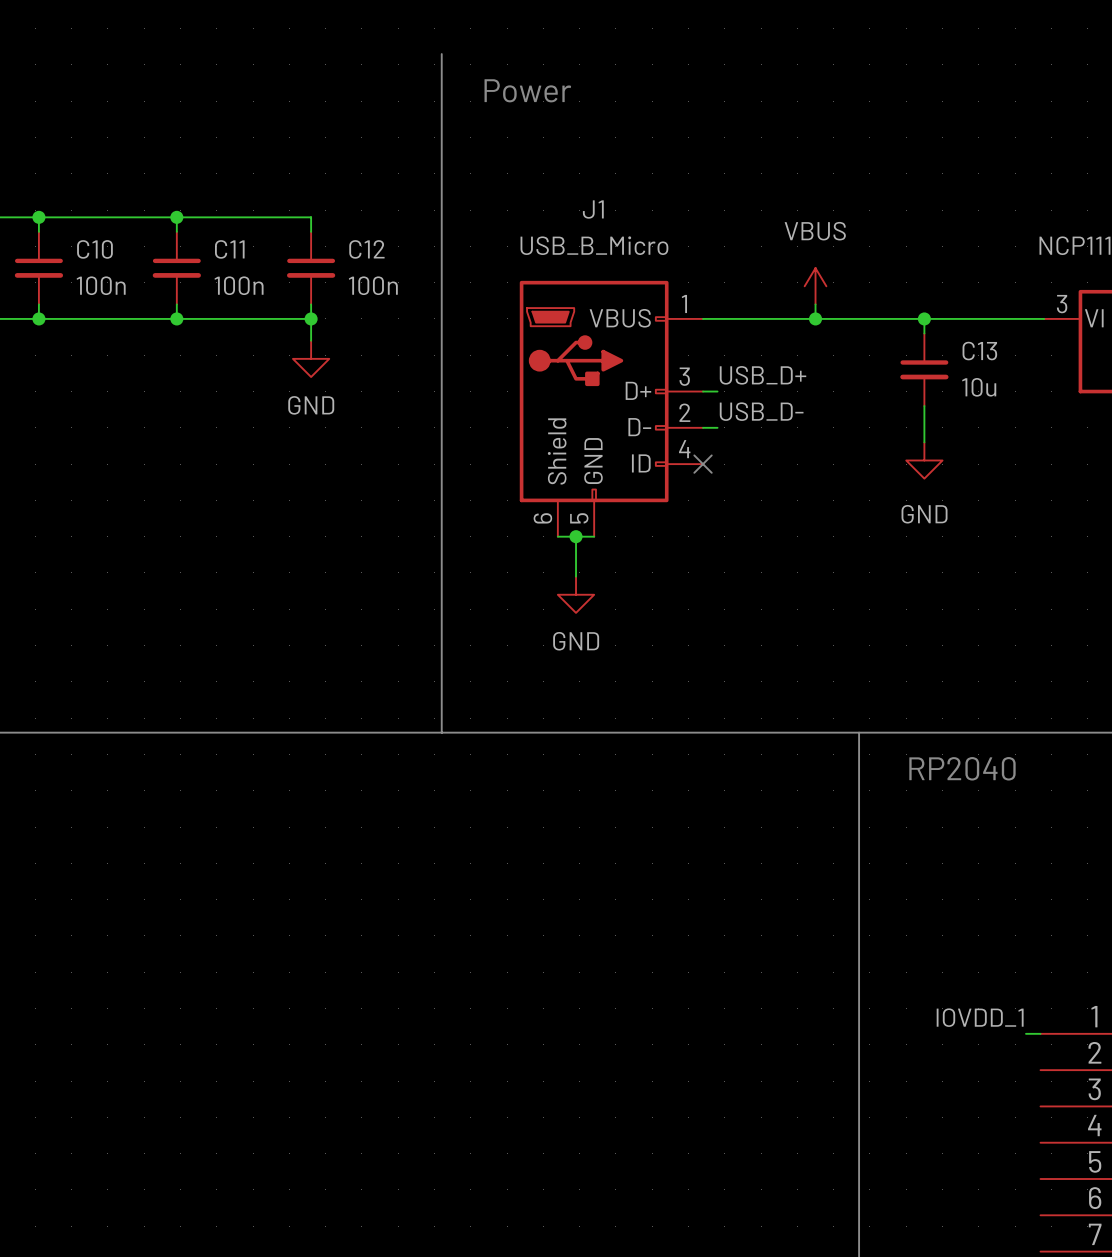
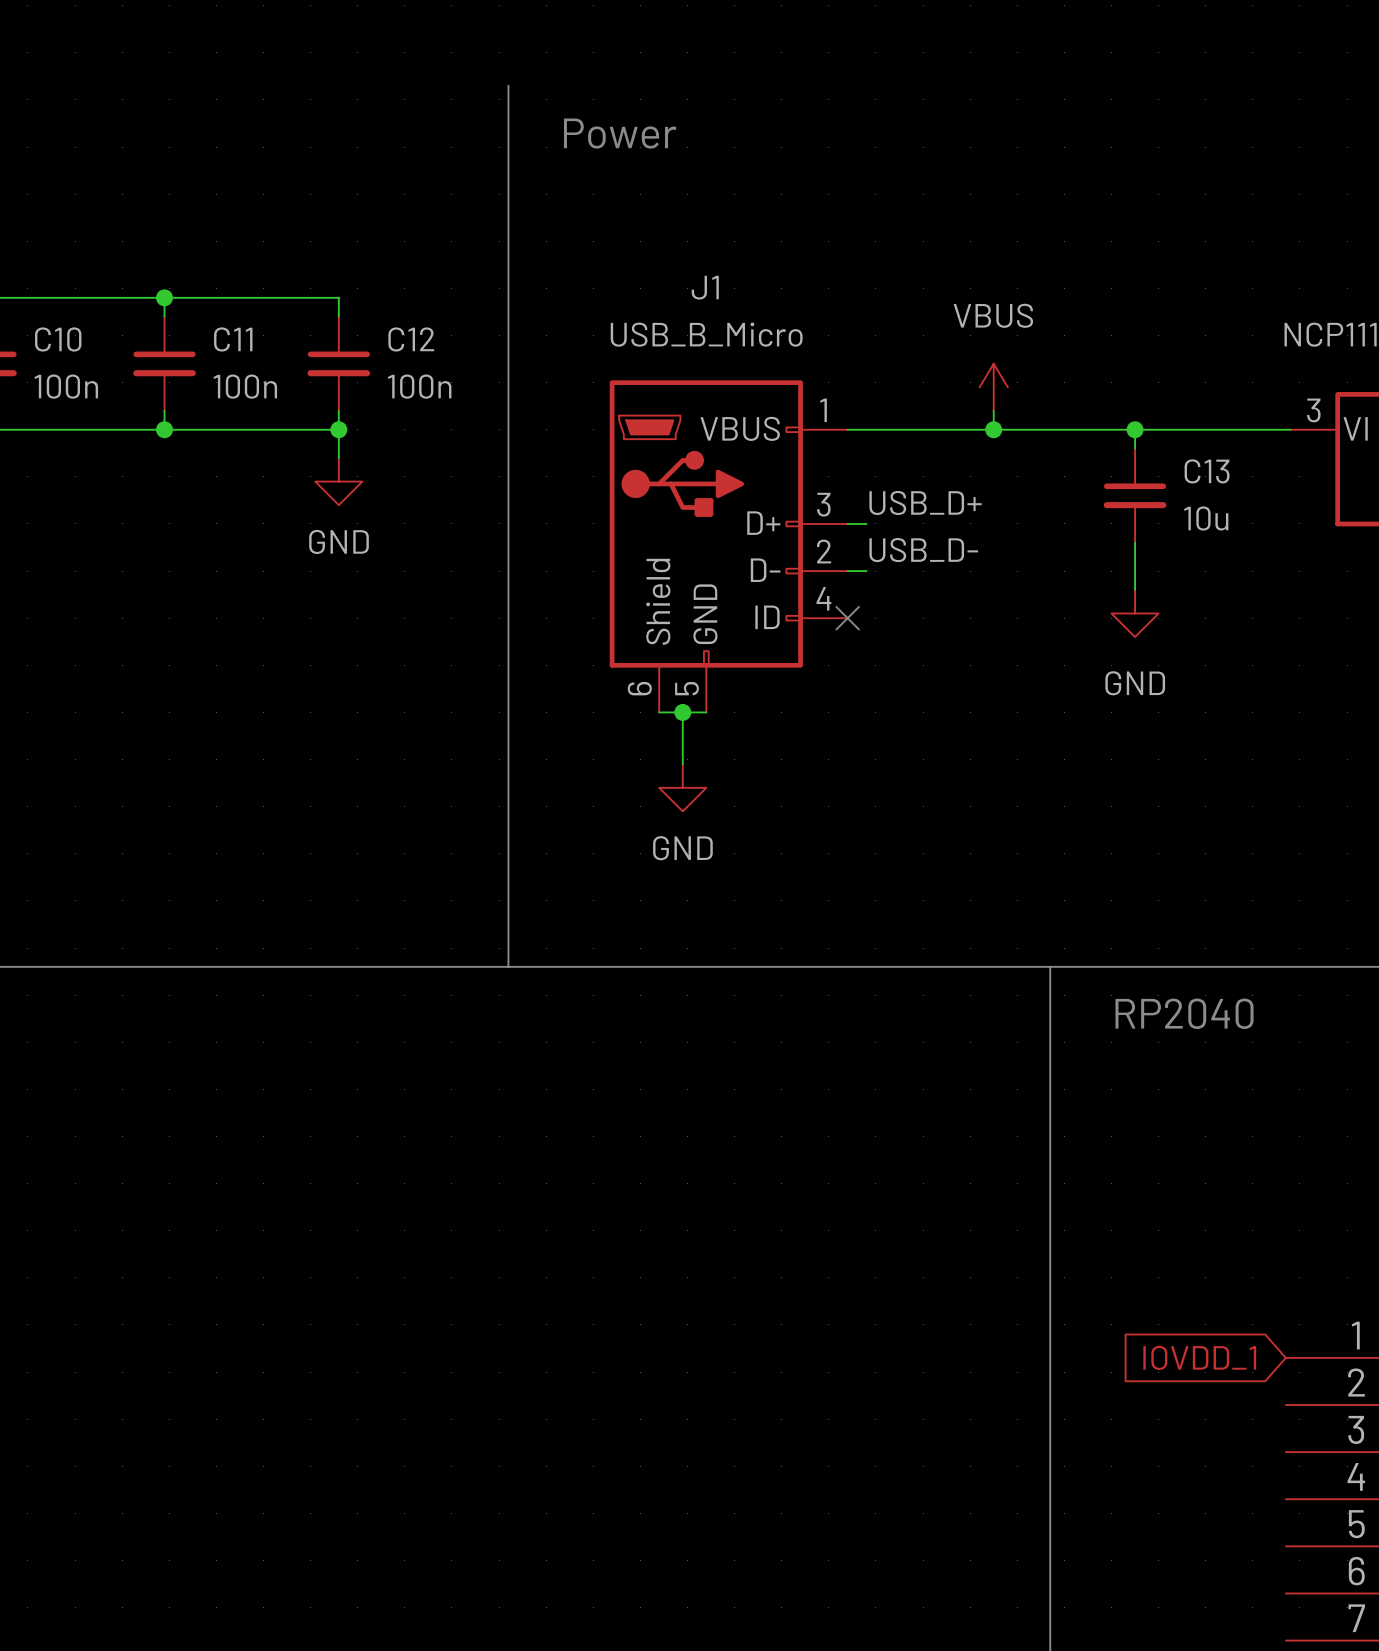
label: IOVDD_1 (980, 1017) -> none
global label: none -> IOVDD_1 (1199, 1357)
wire: (1026, 1033) (1040, 1033) -> none

